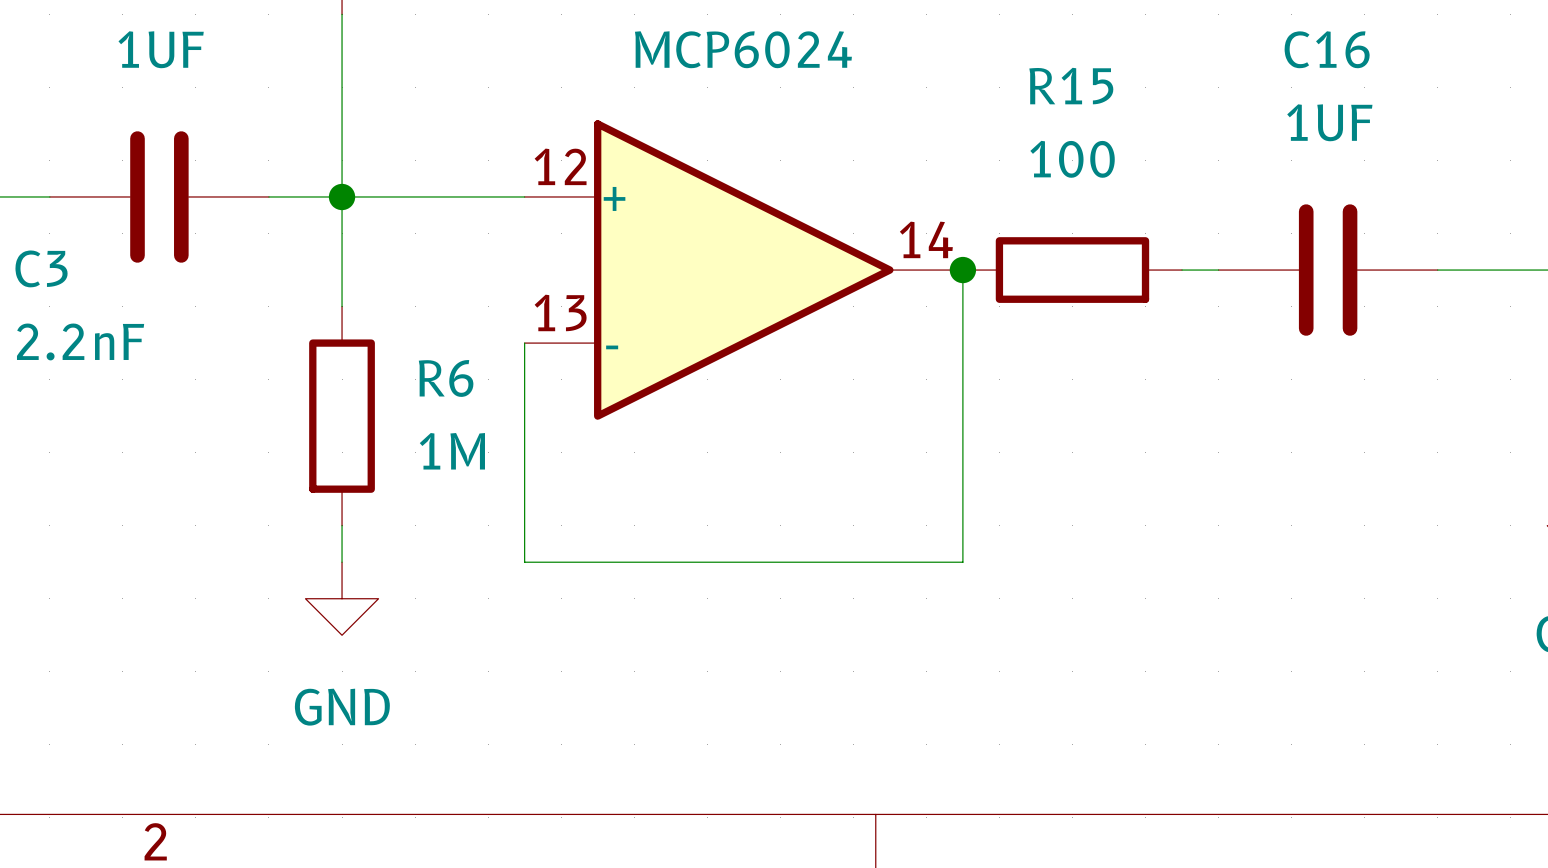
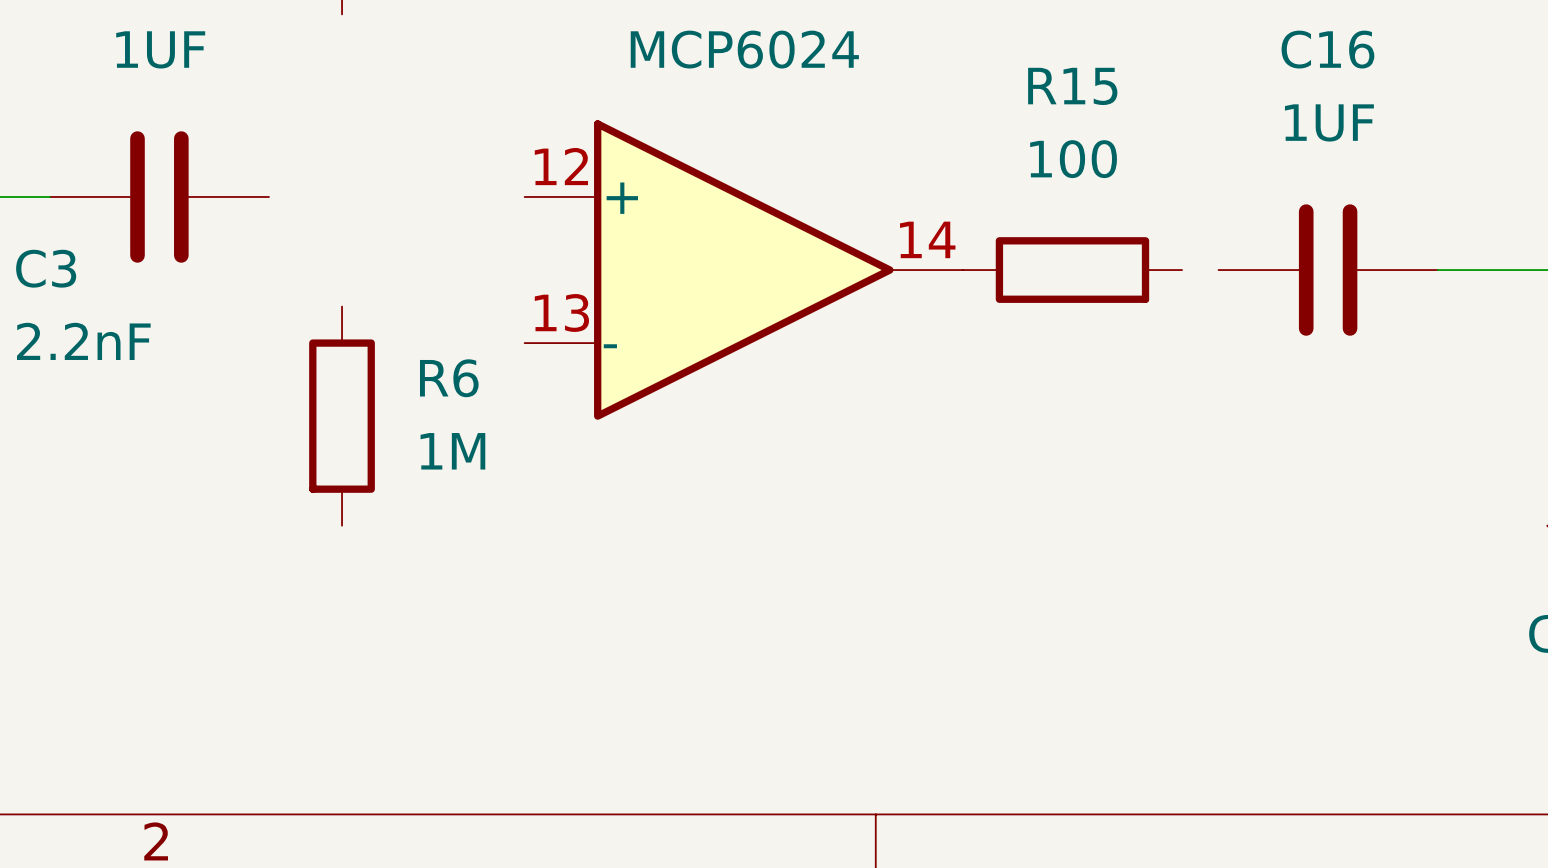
wire: (342, 14) (342, 306) -> none
wire: (268, 196) (524, 196) -> none
junction: (342, 196) -> none
wire: (962, 270) (962, 562) (524, 562) (524, 343) -> none
junction: (962, 270) -> none
wire: (1182, 270) (1218, 270) -> none
wire: (342, 525) (342, 562) -> none
power symbol: GND (342, 598) -> none

